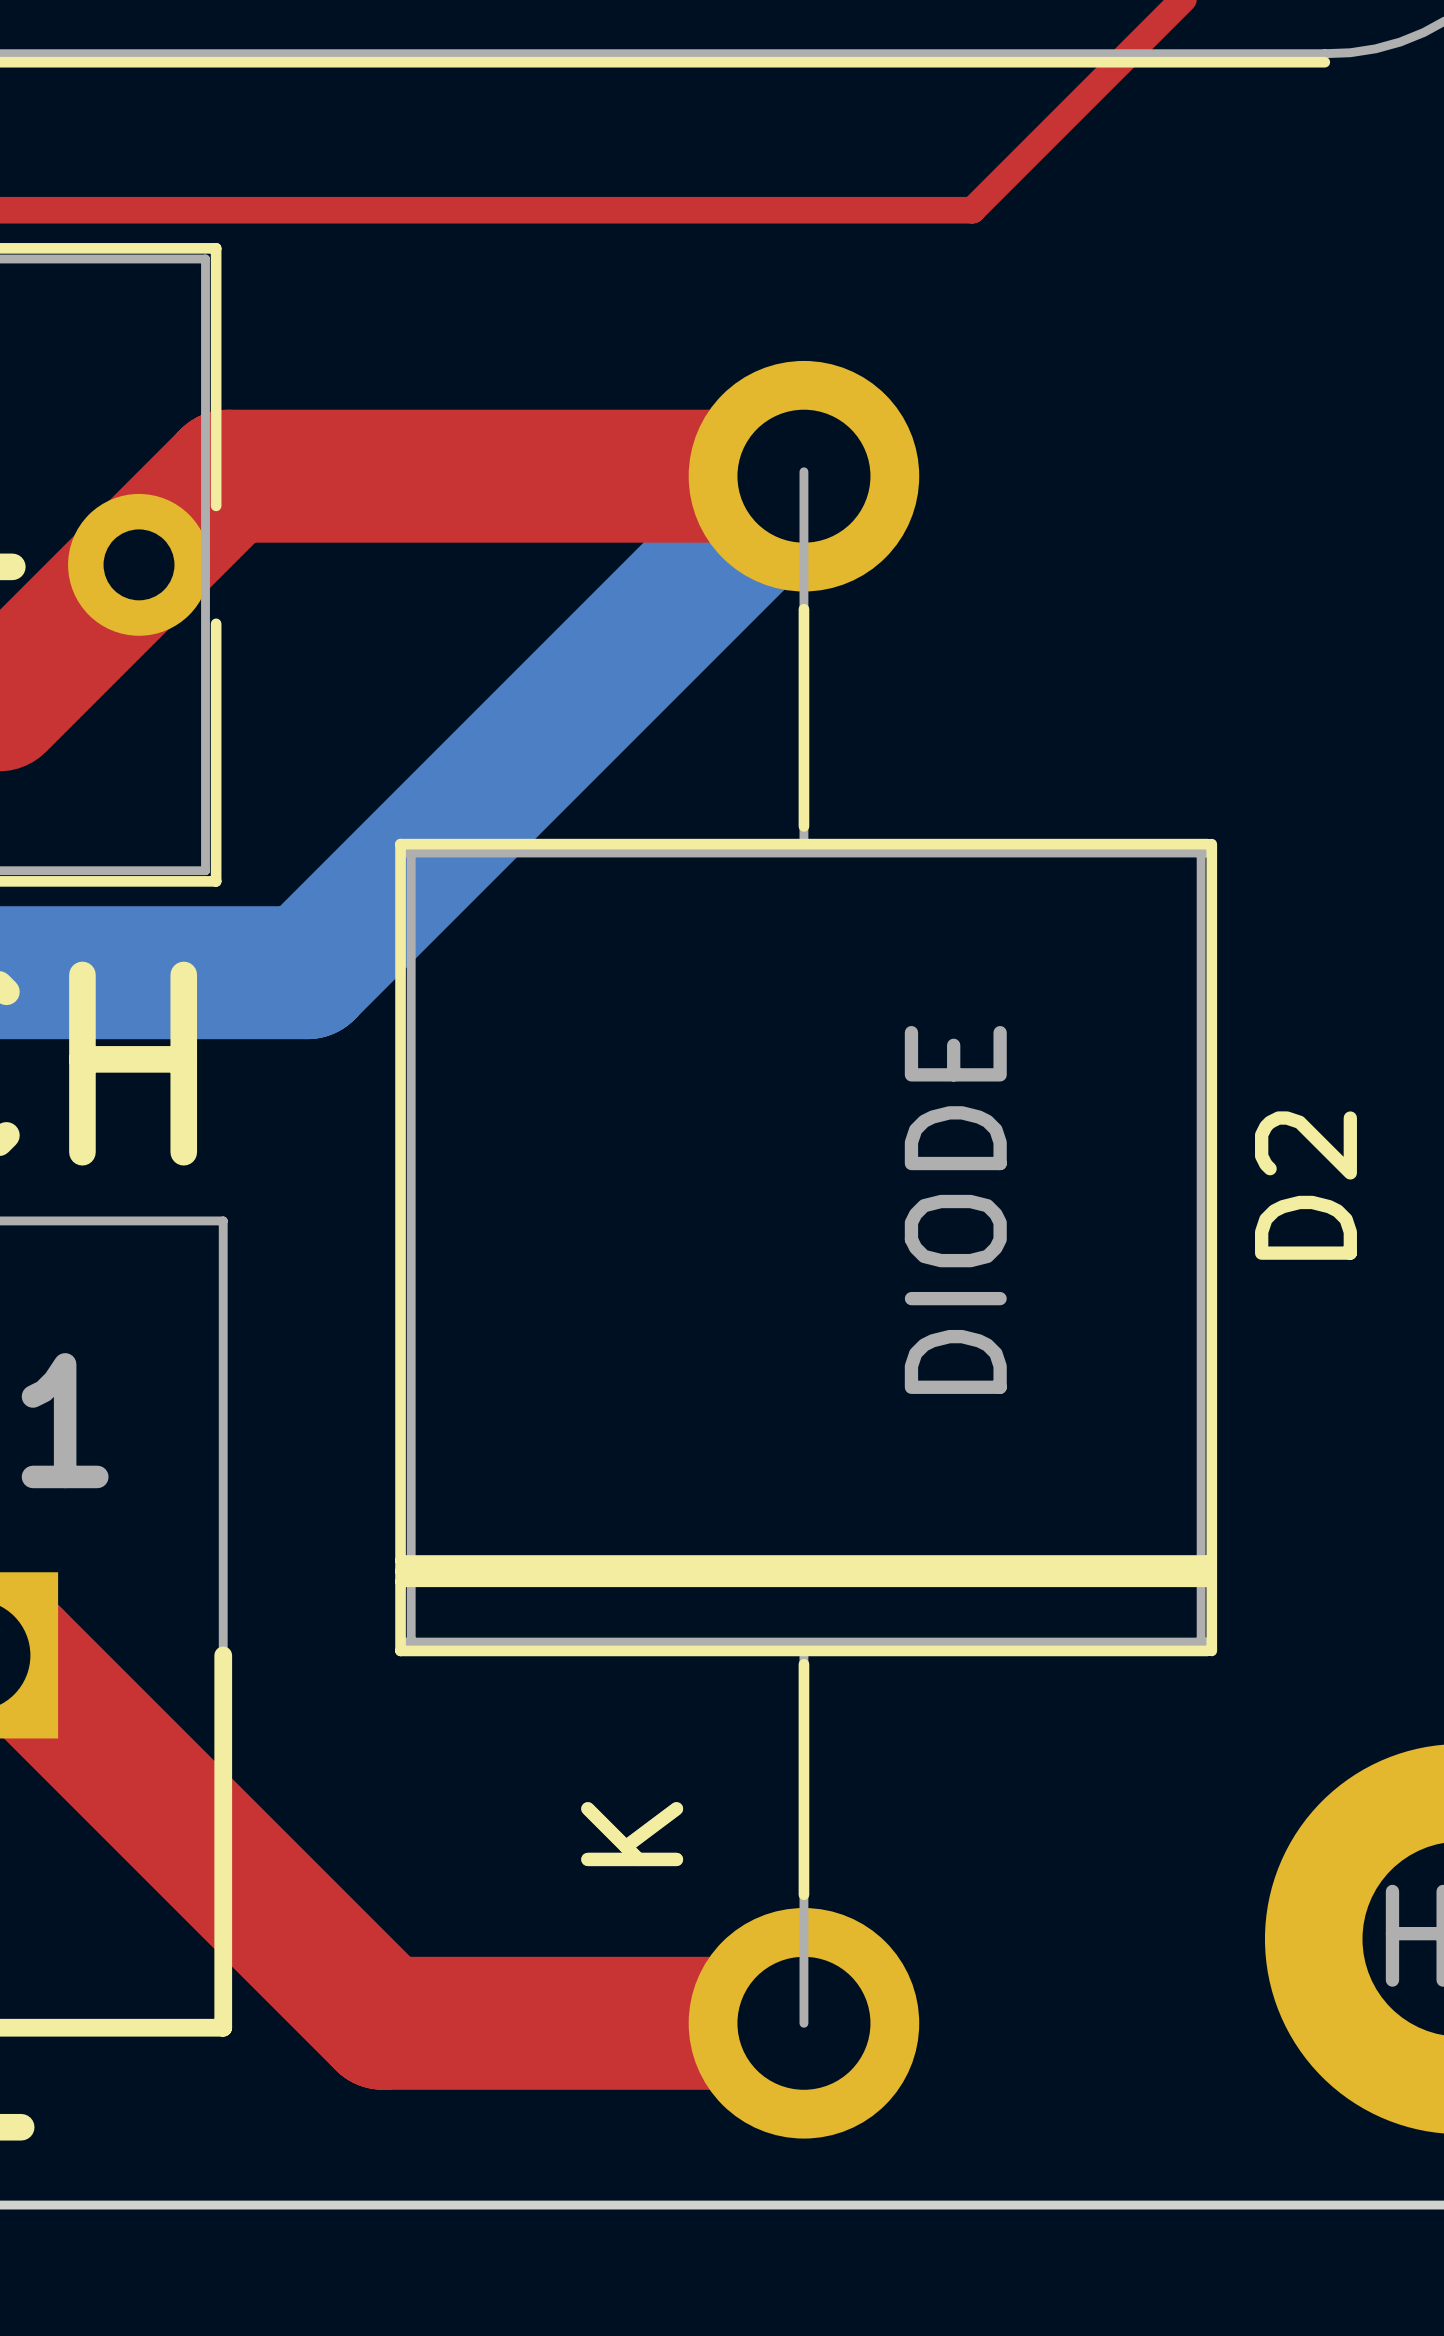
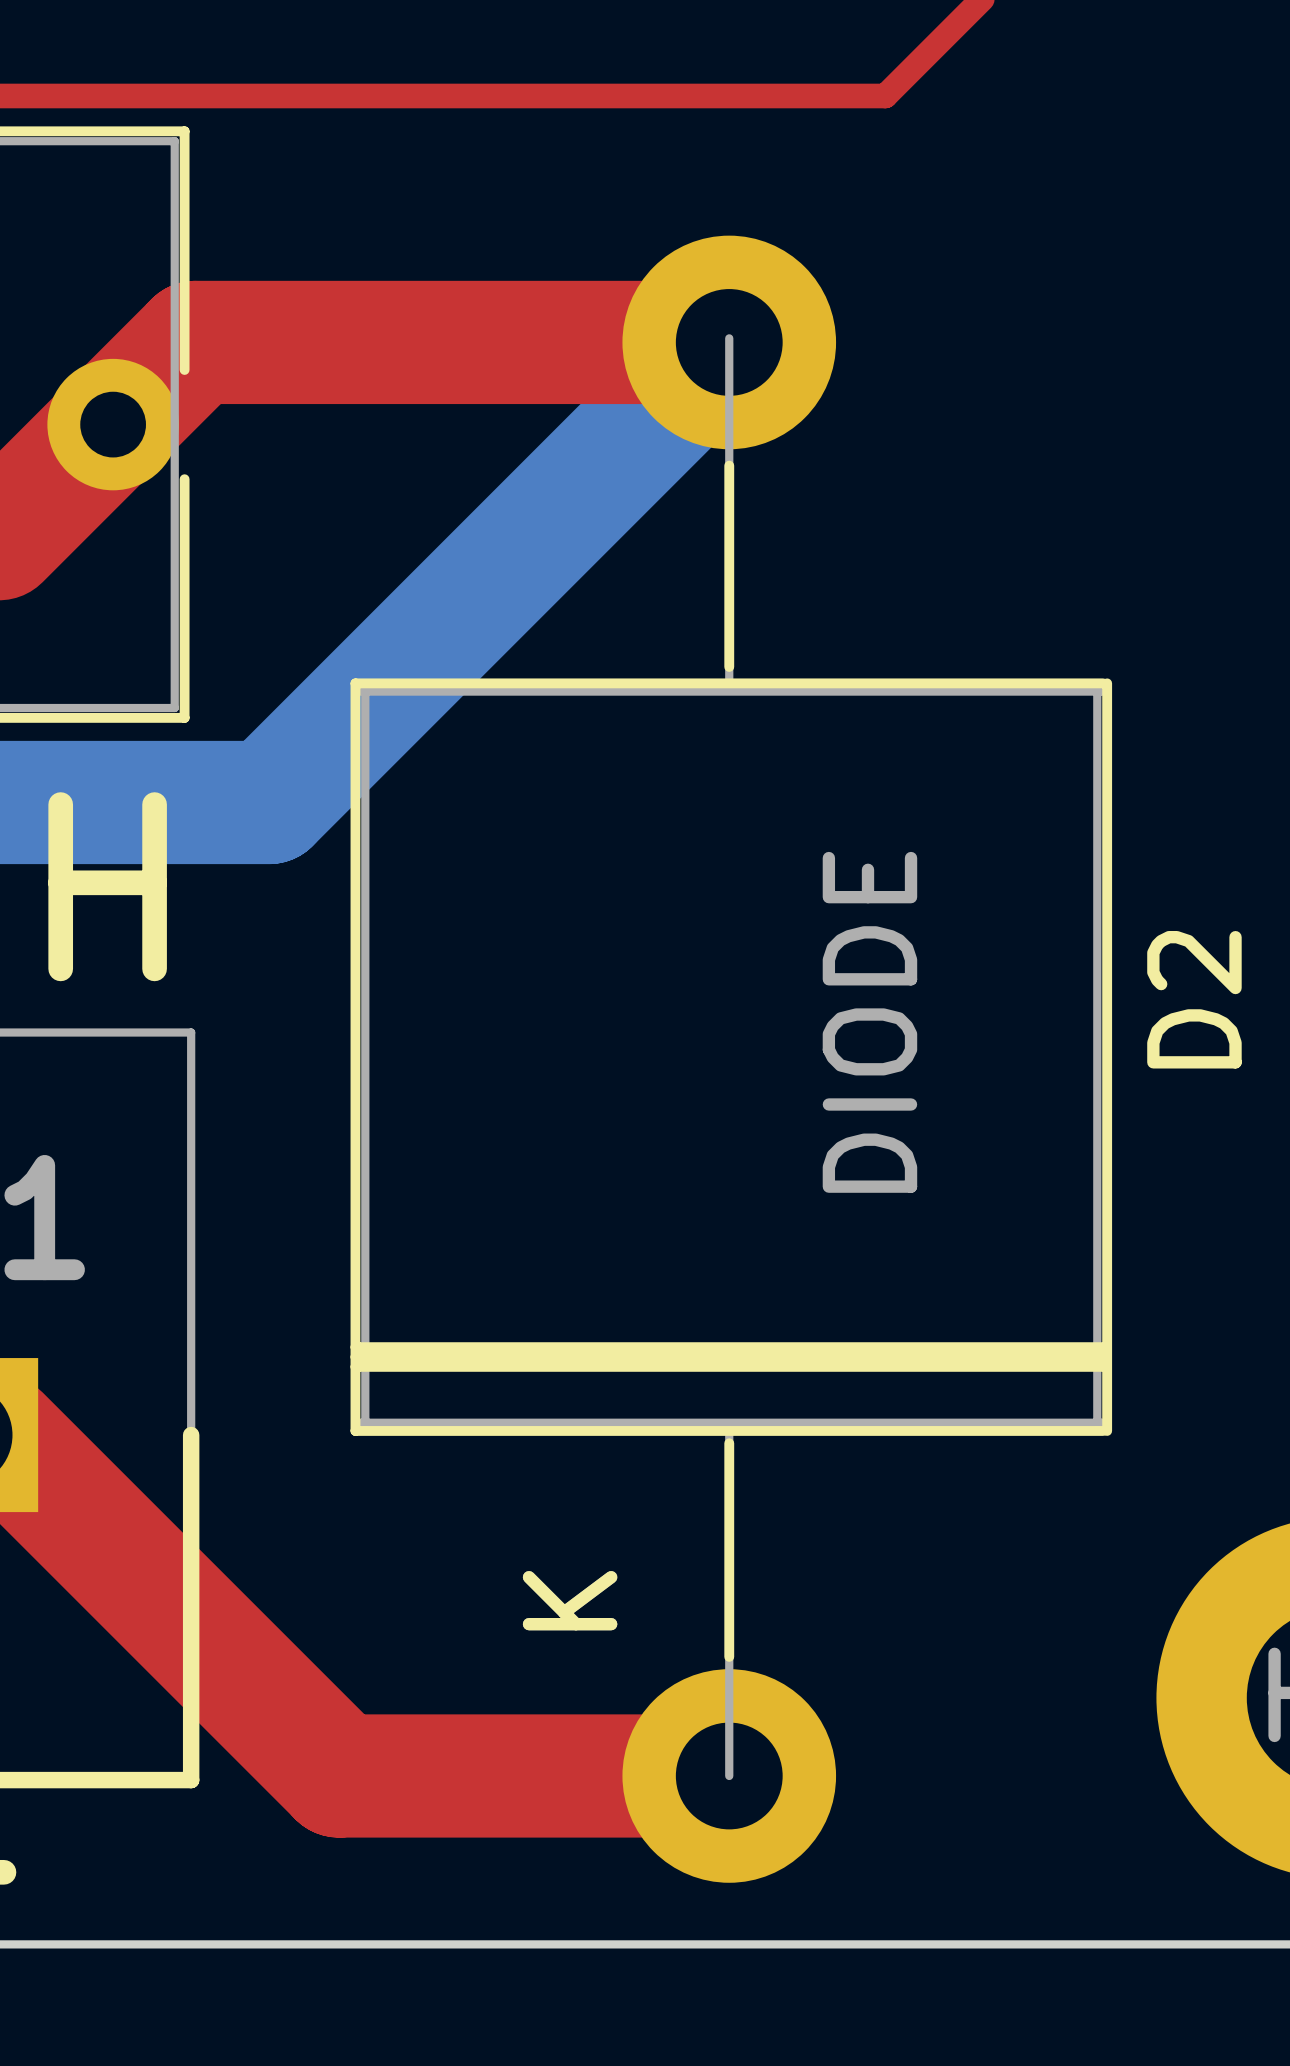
D2 footprint: [395, 360, 1218, 2139] -> [350, 235, 1113, 1883]

